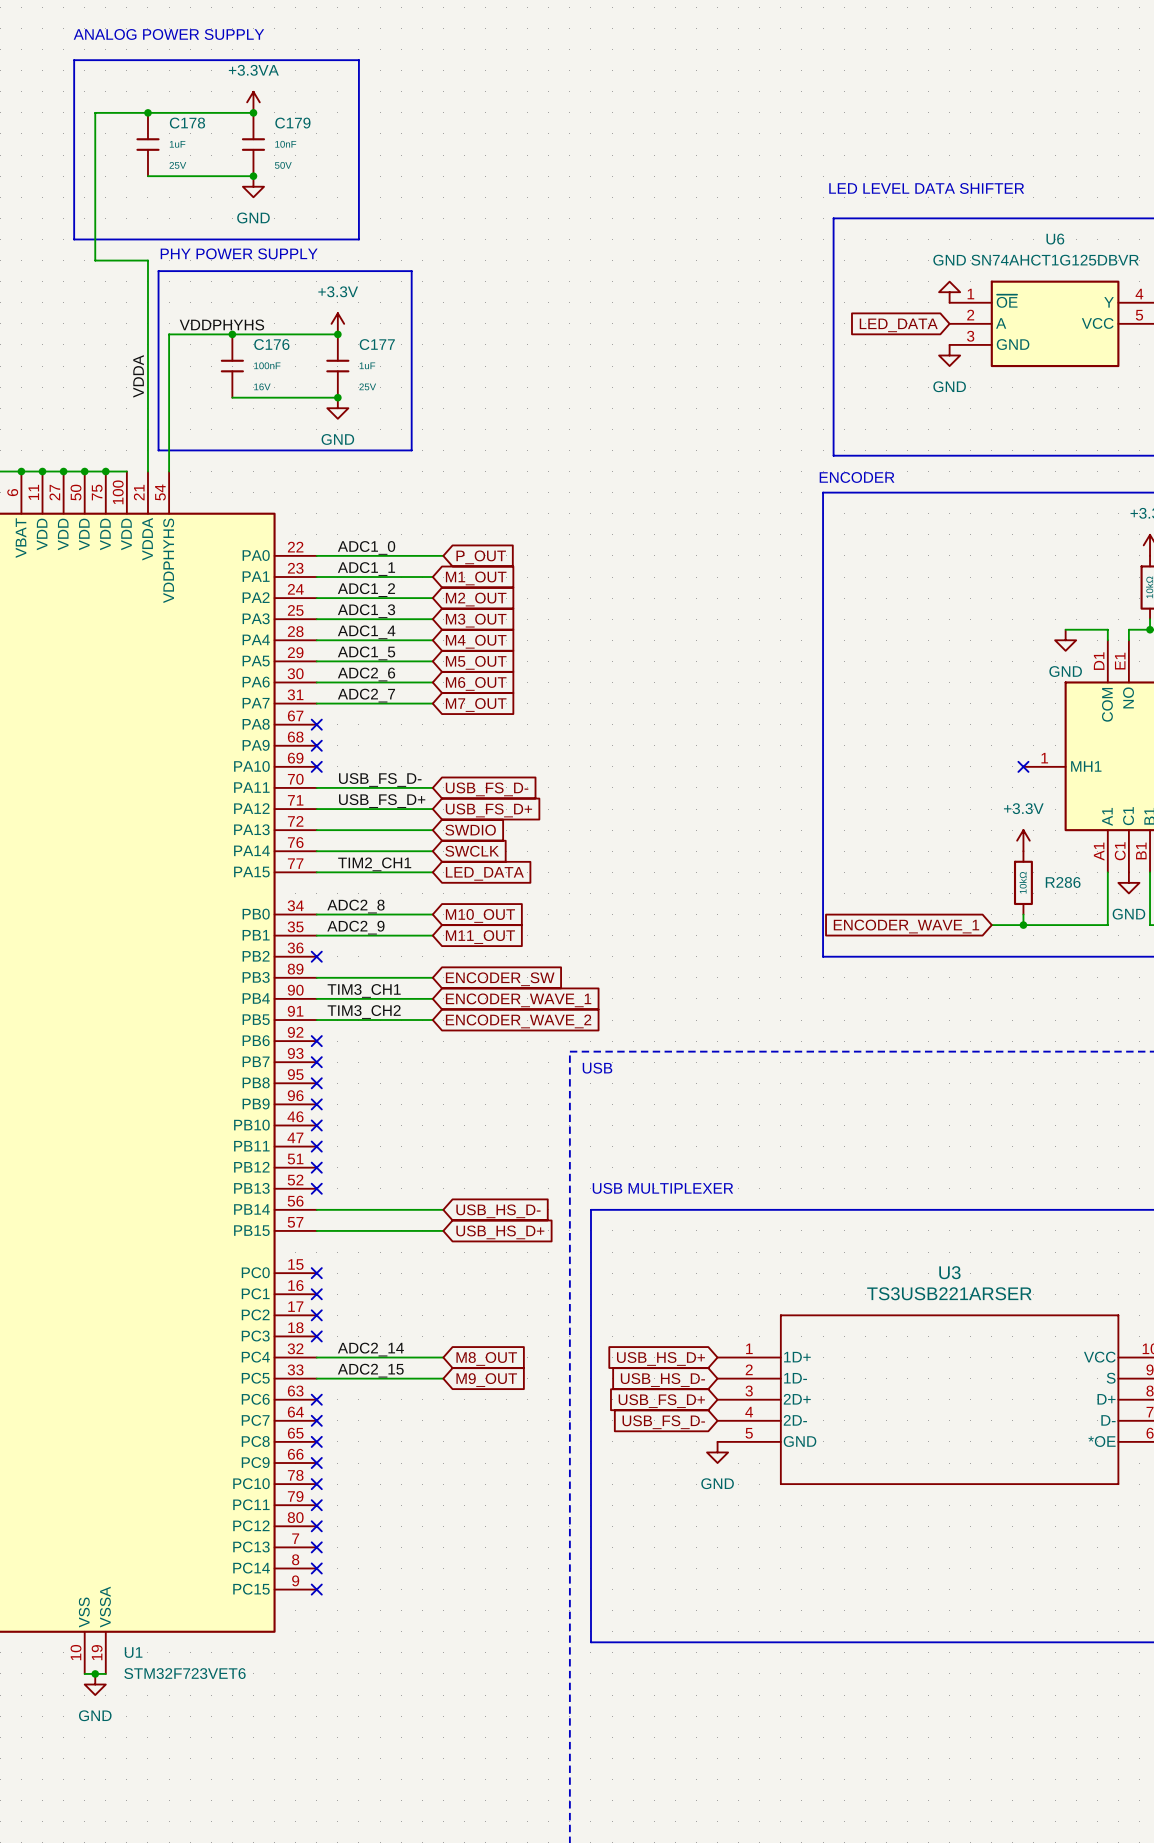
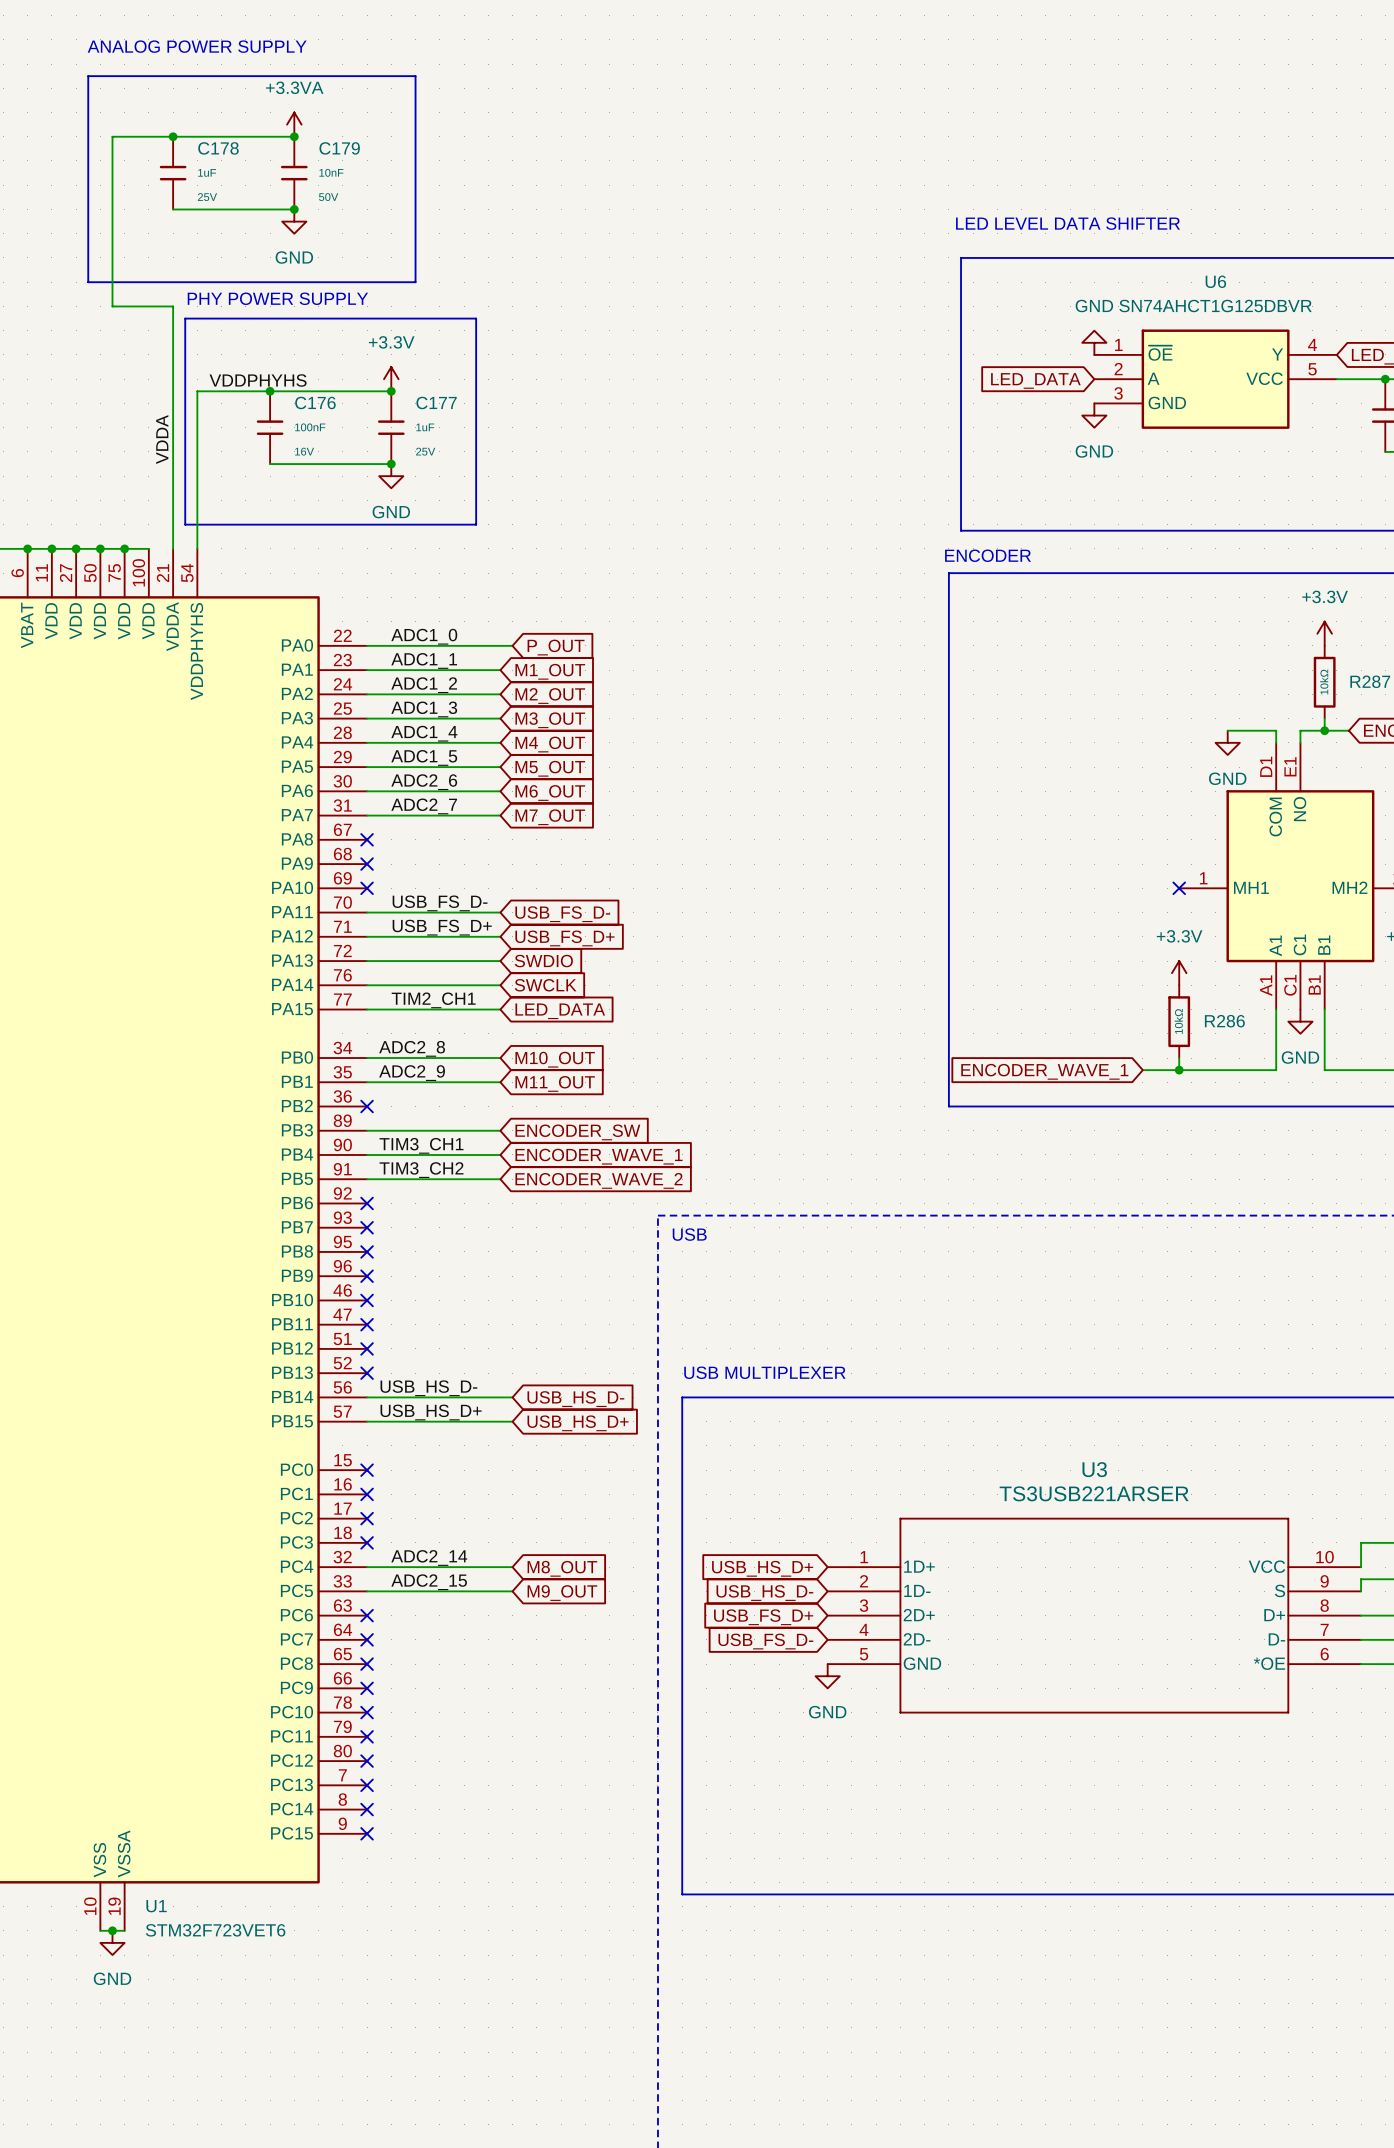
label: none -> USB_HS_D- (428, 1388)
label: none -> USB_HS_D+ (431, 1412)

